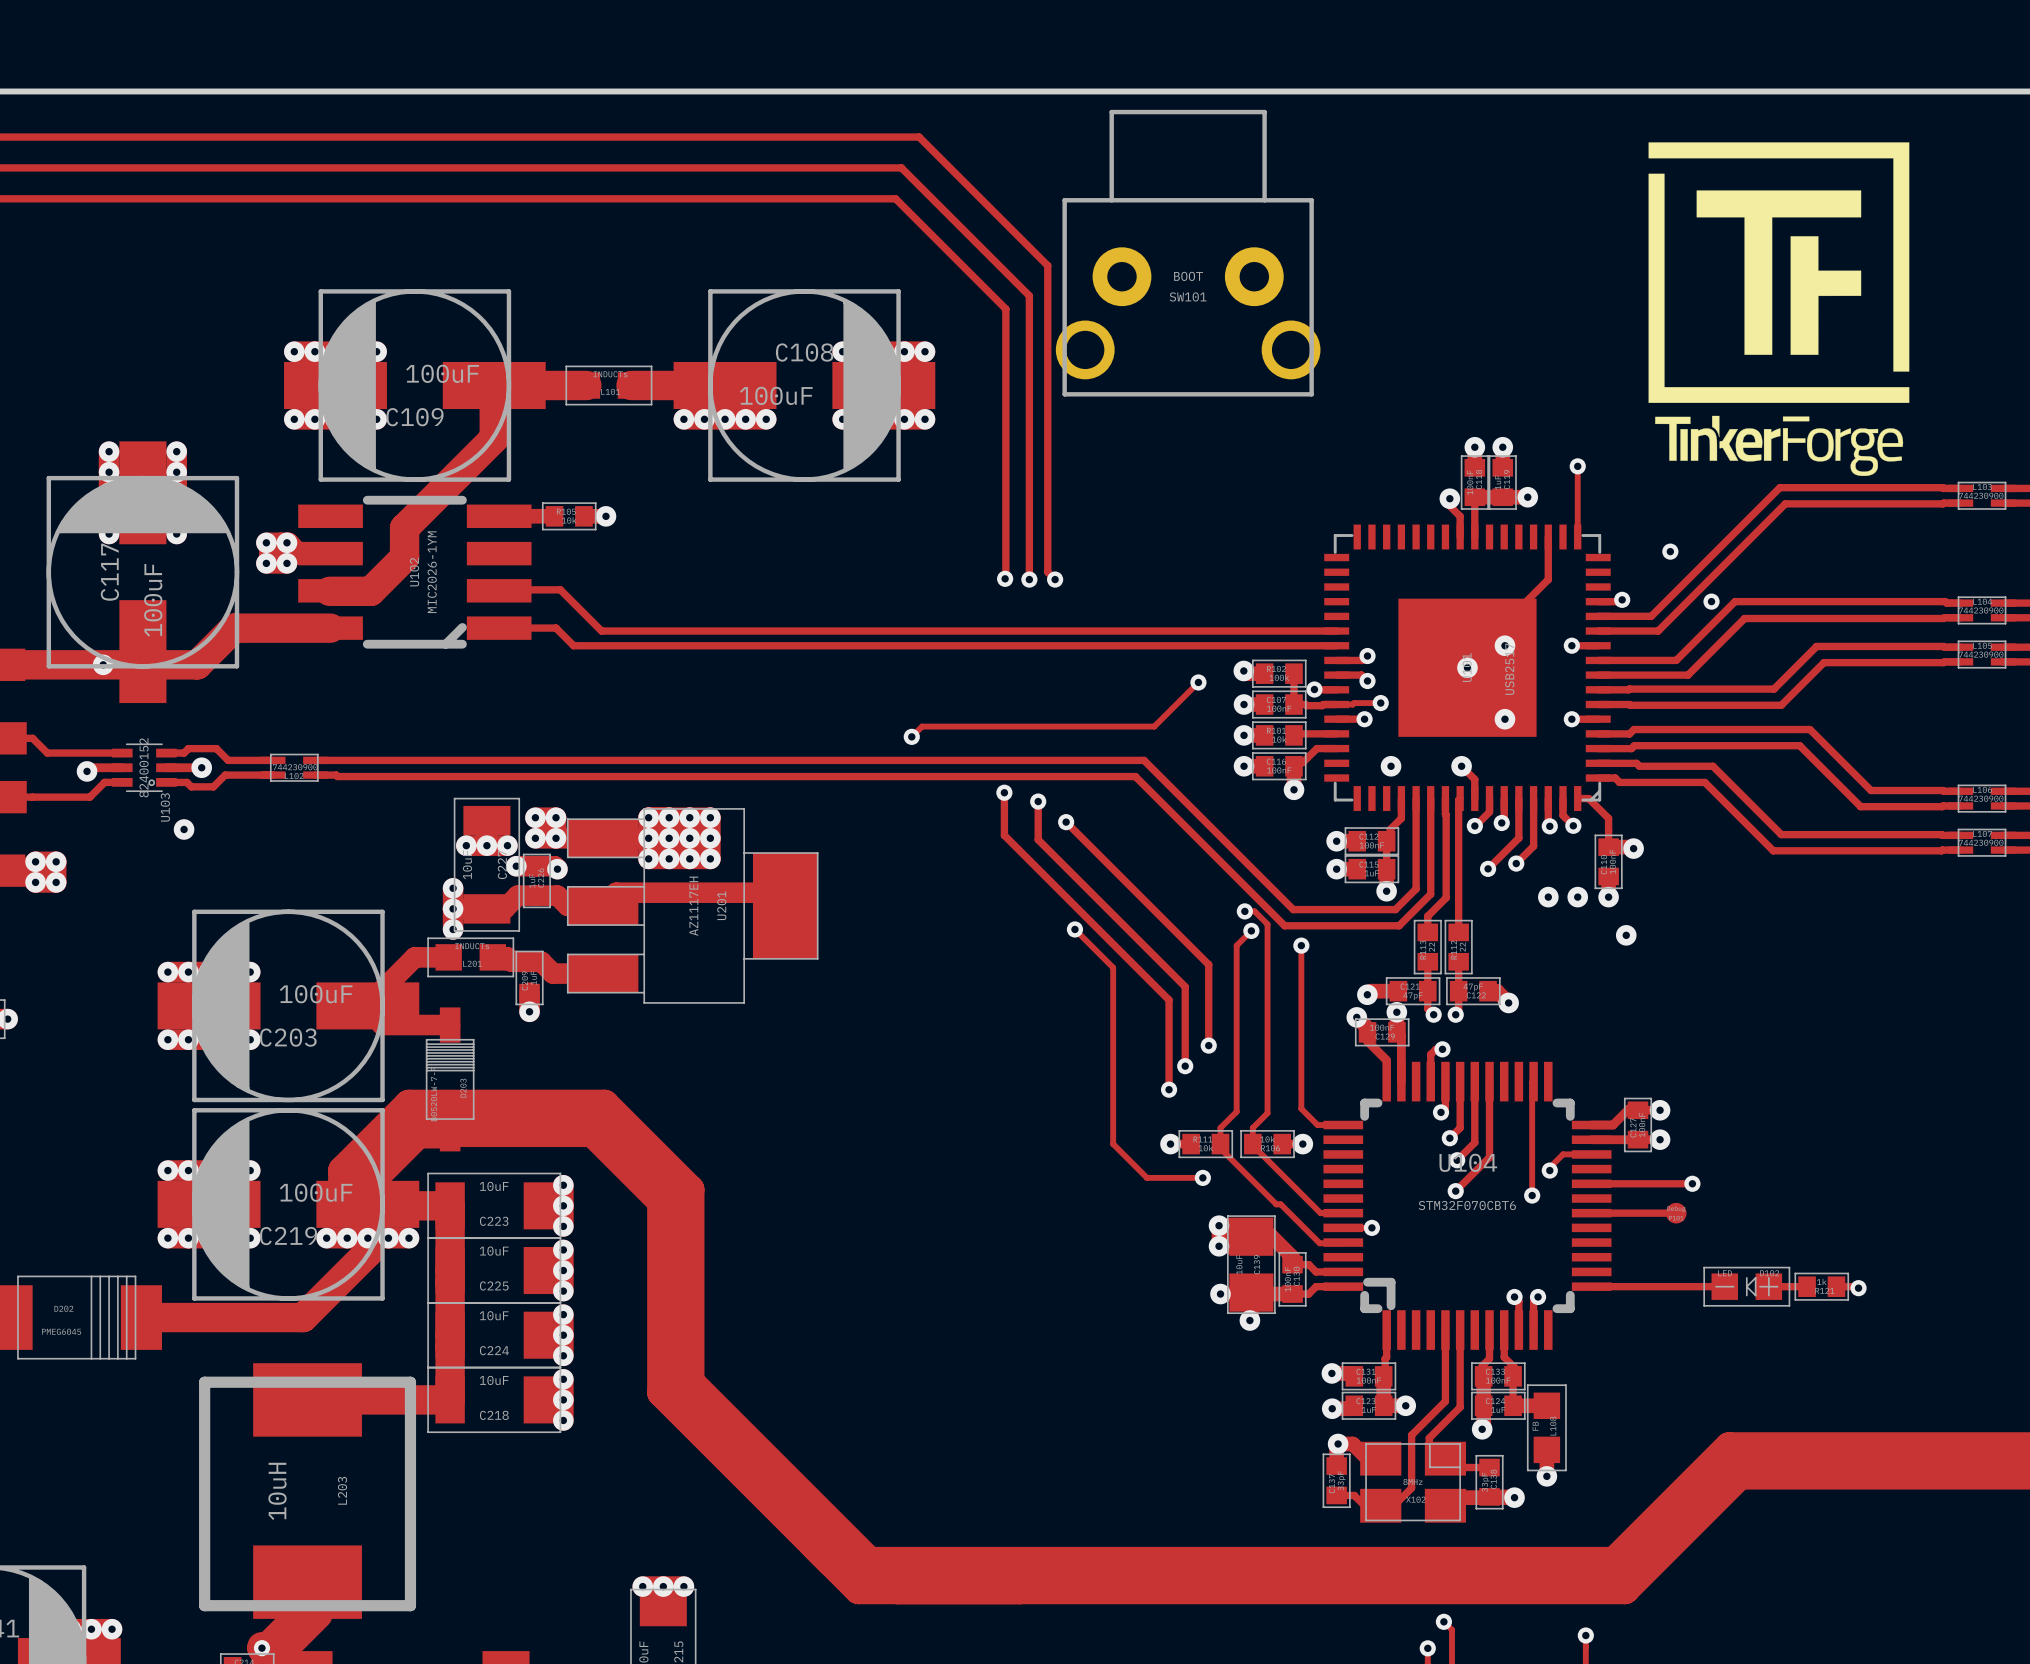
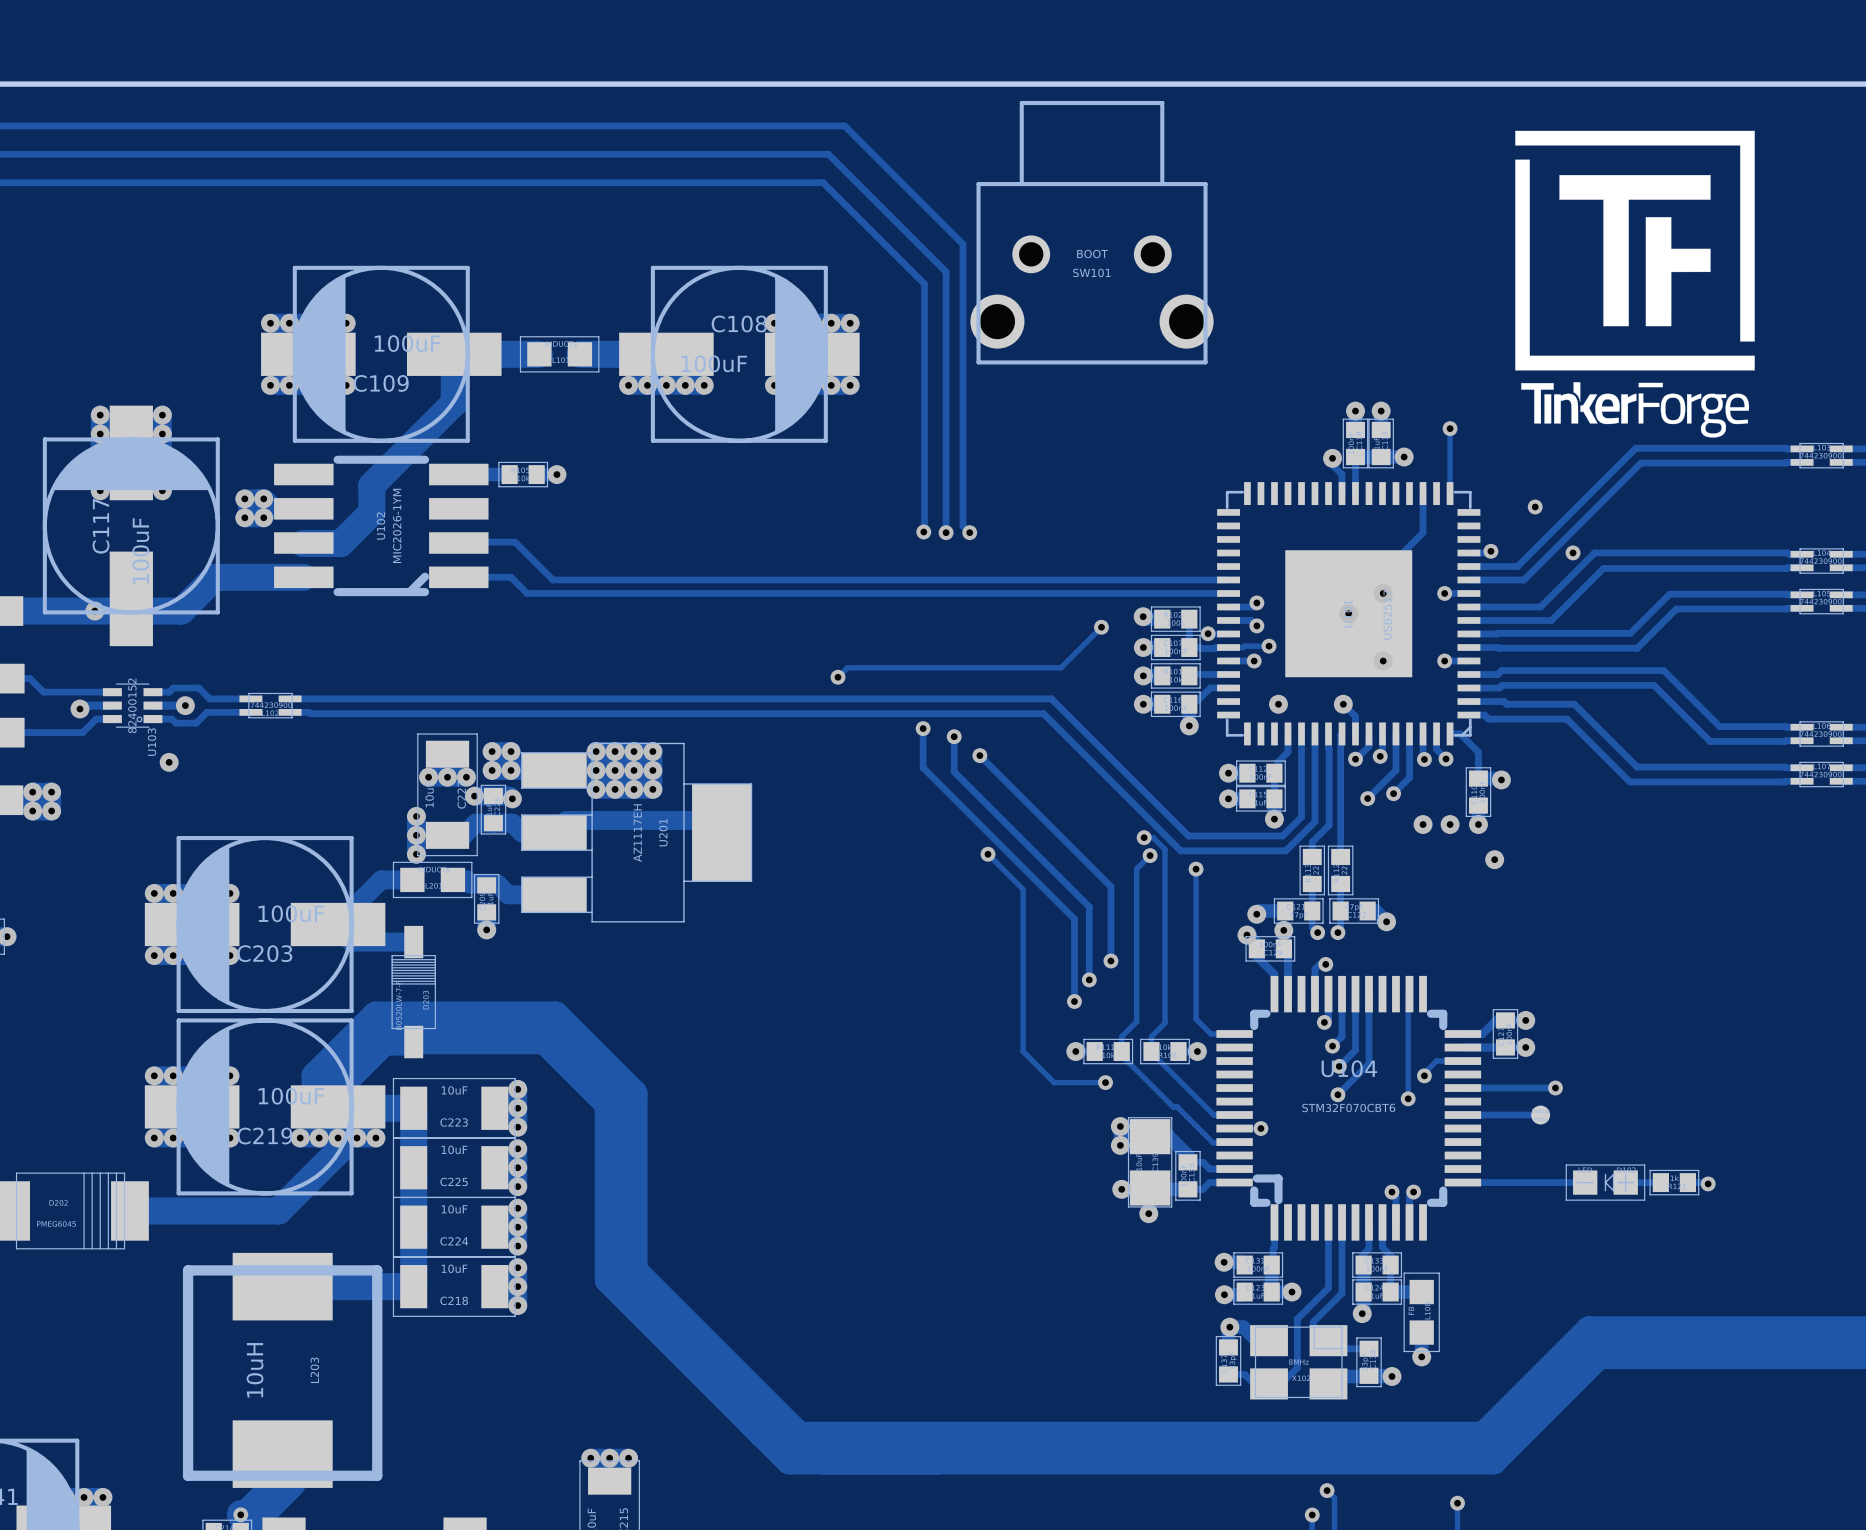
SW101 footprint: [1055, 109, 1321, 397] -> [970, 100, 1214, 365]

